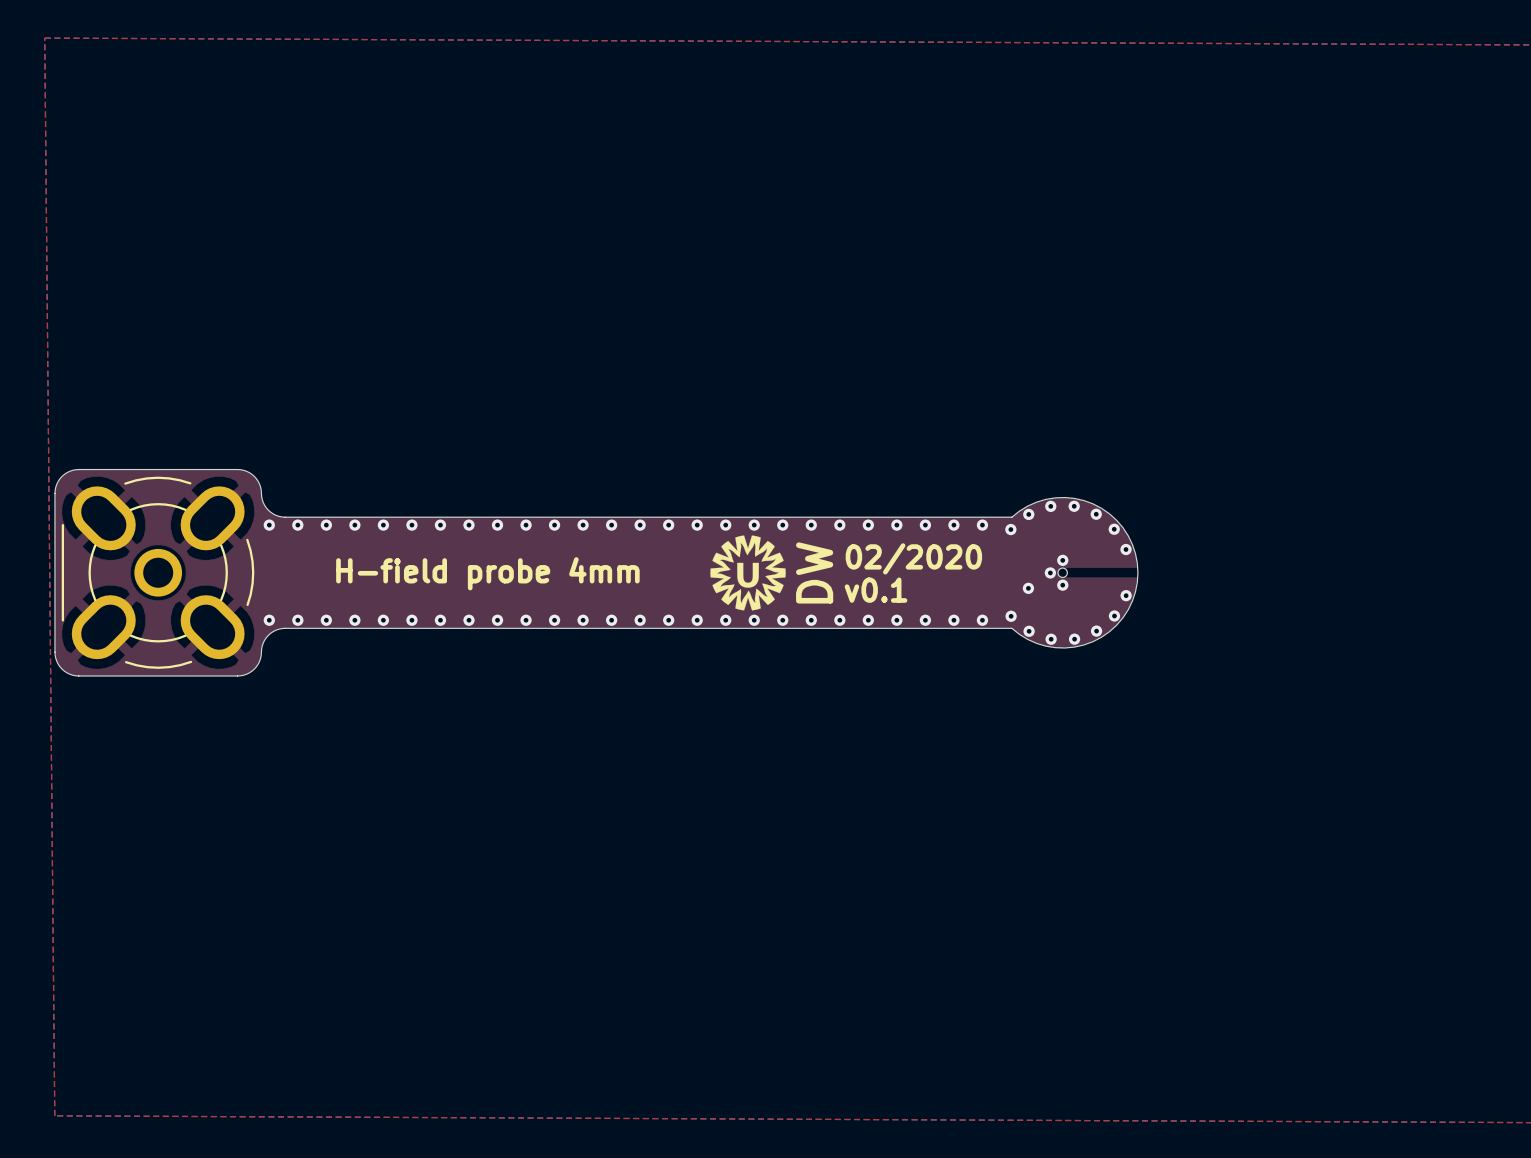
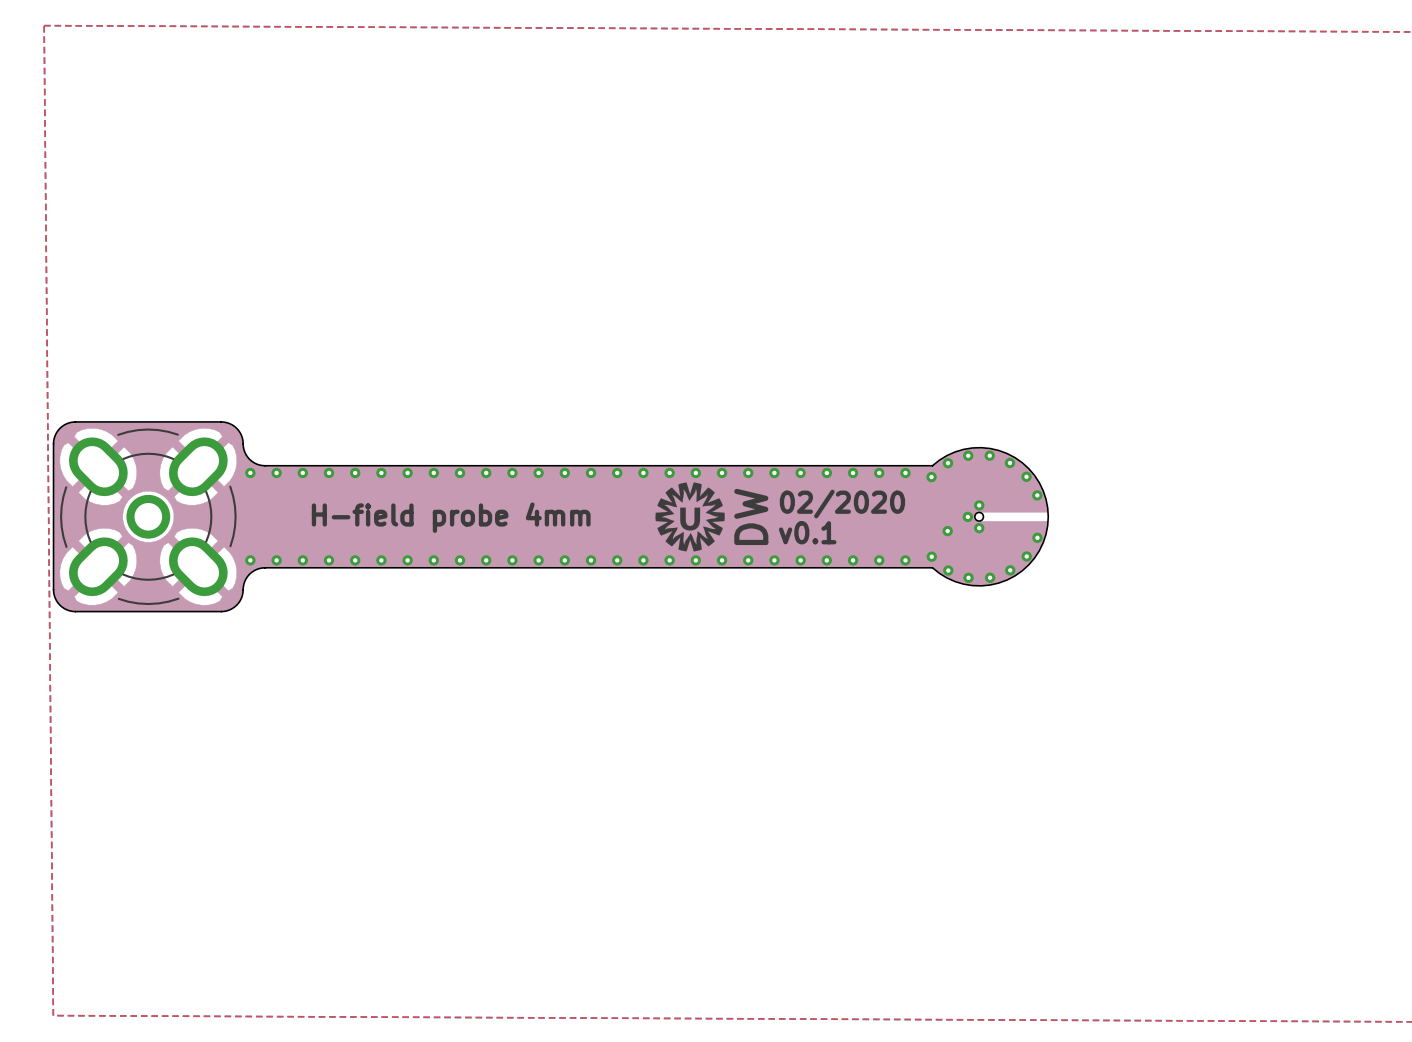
part footprint: [61, 476, 255, 669] -> [60, 428, 237, 606]

